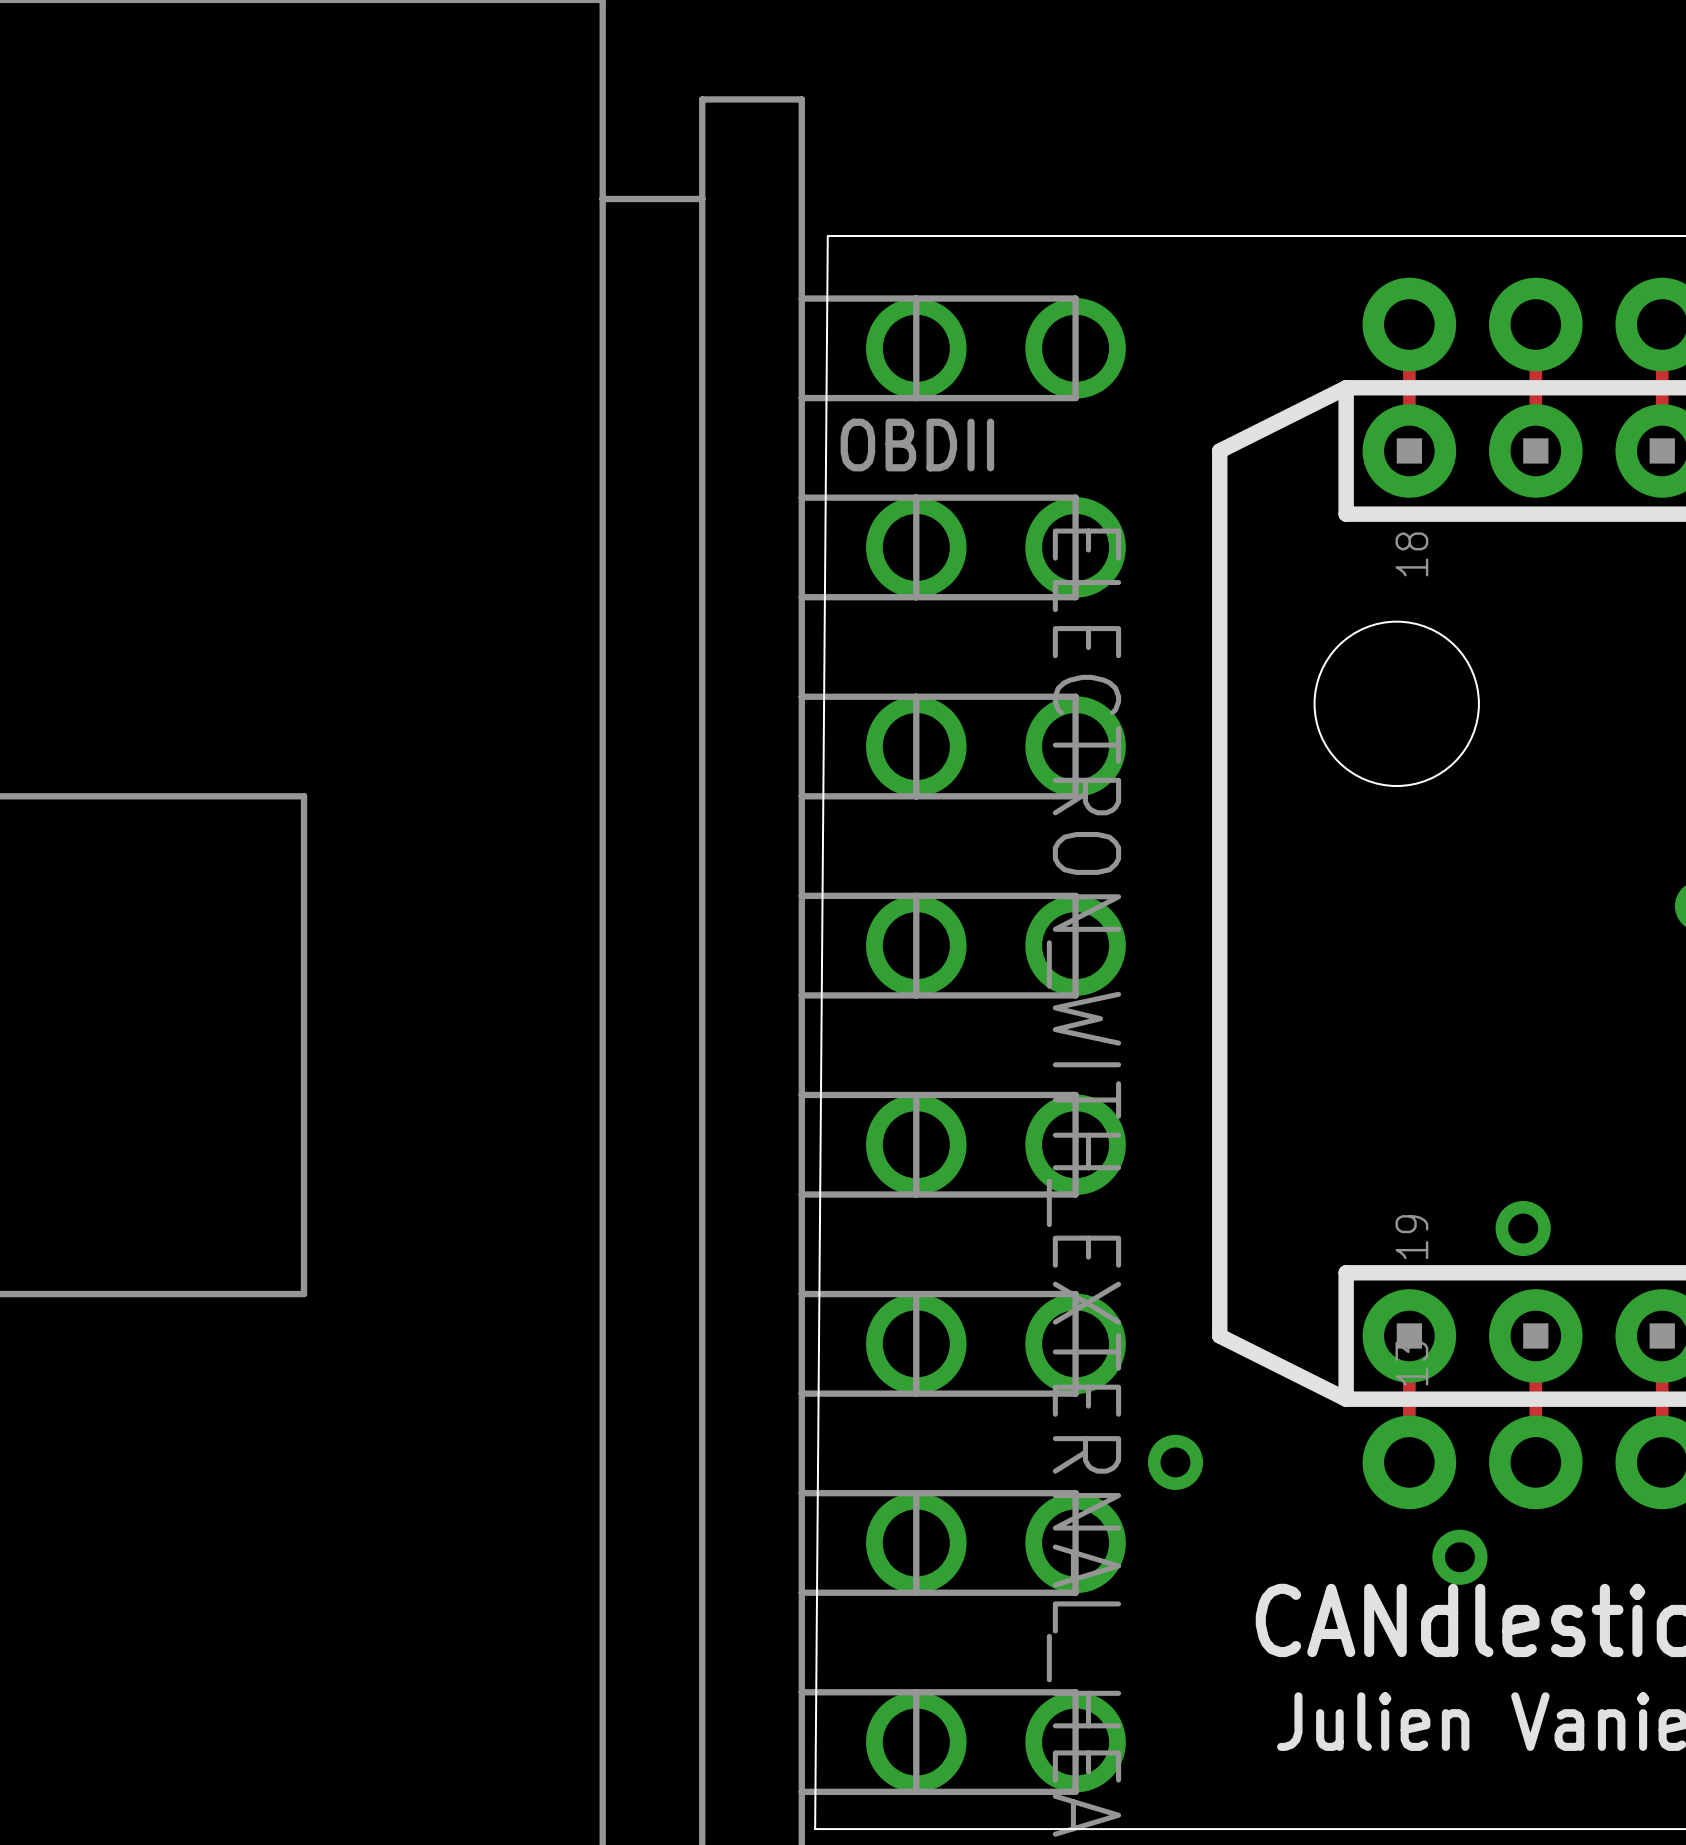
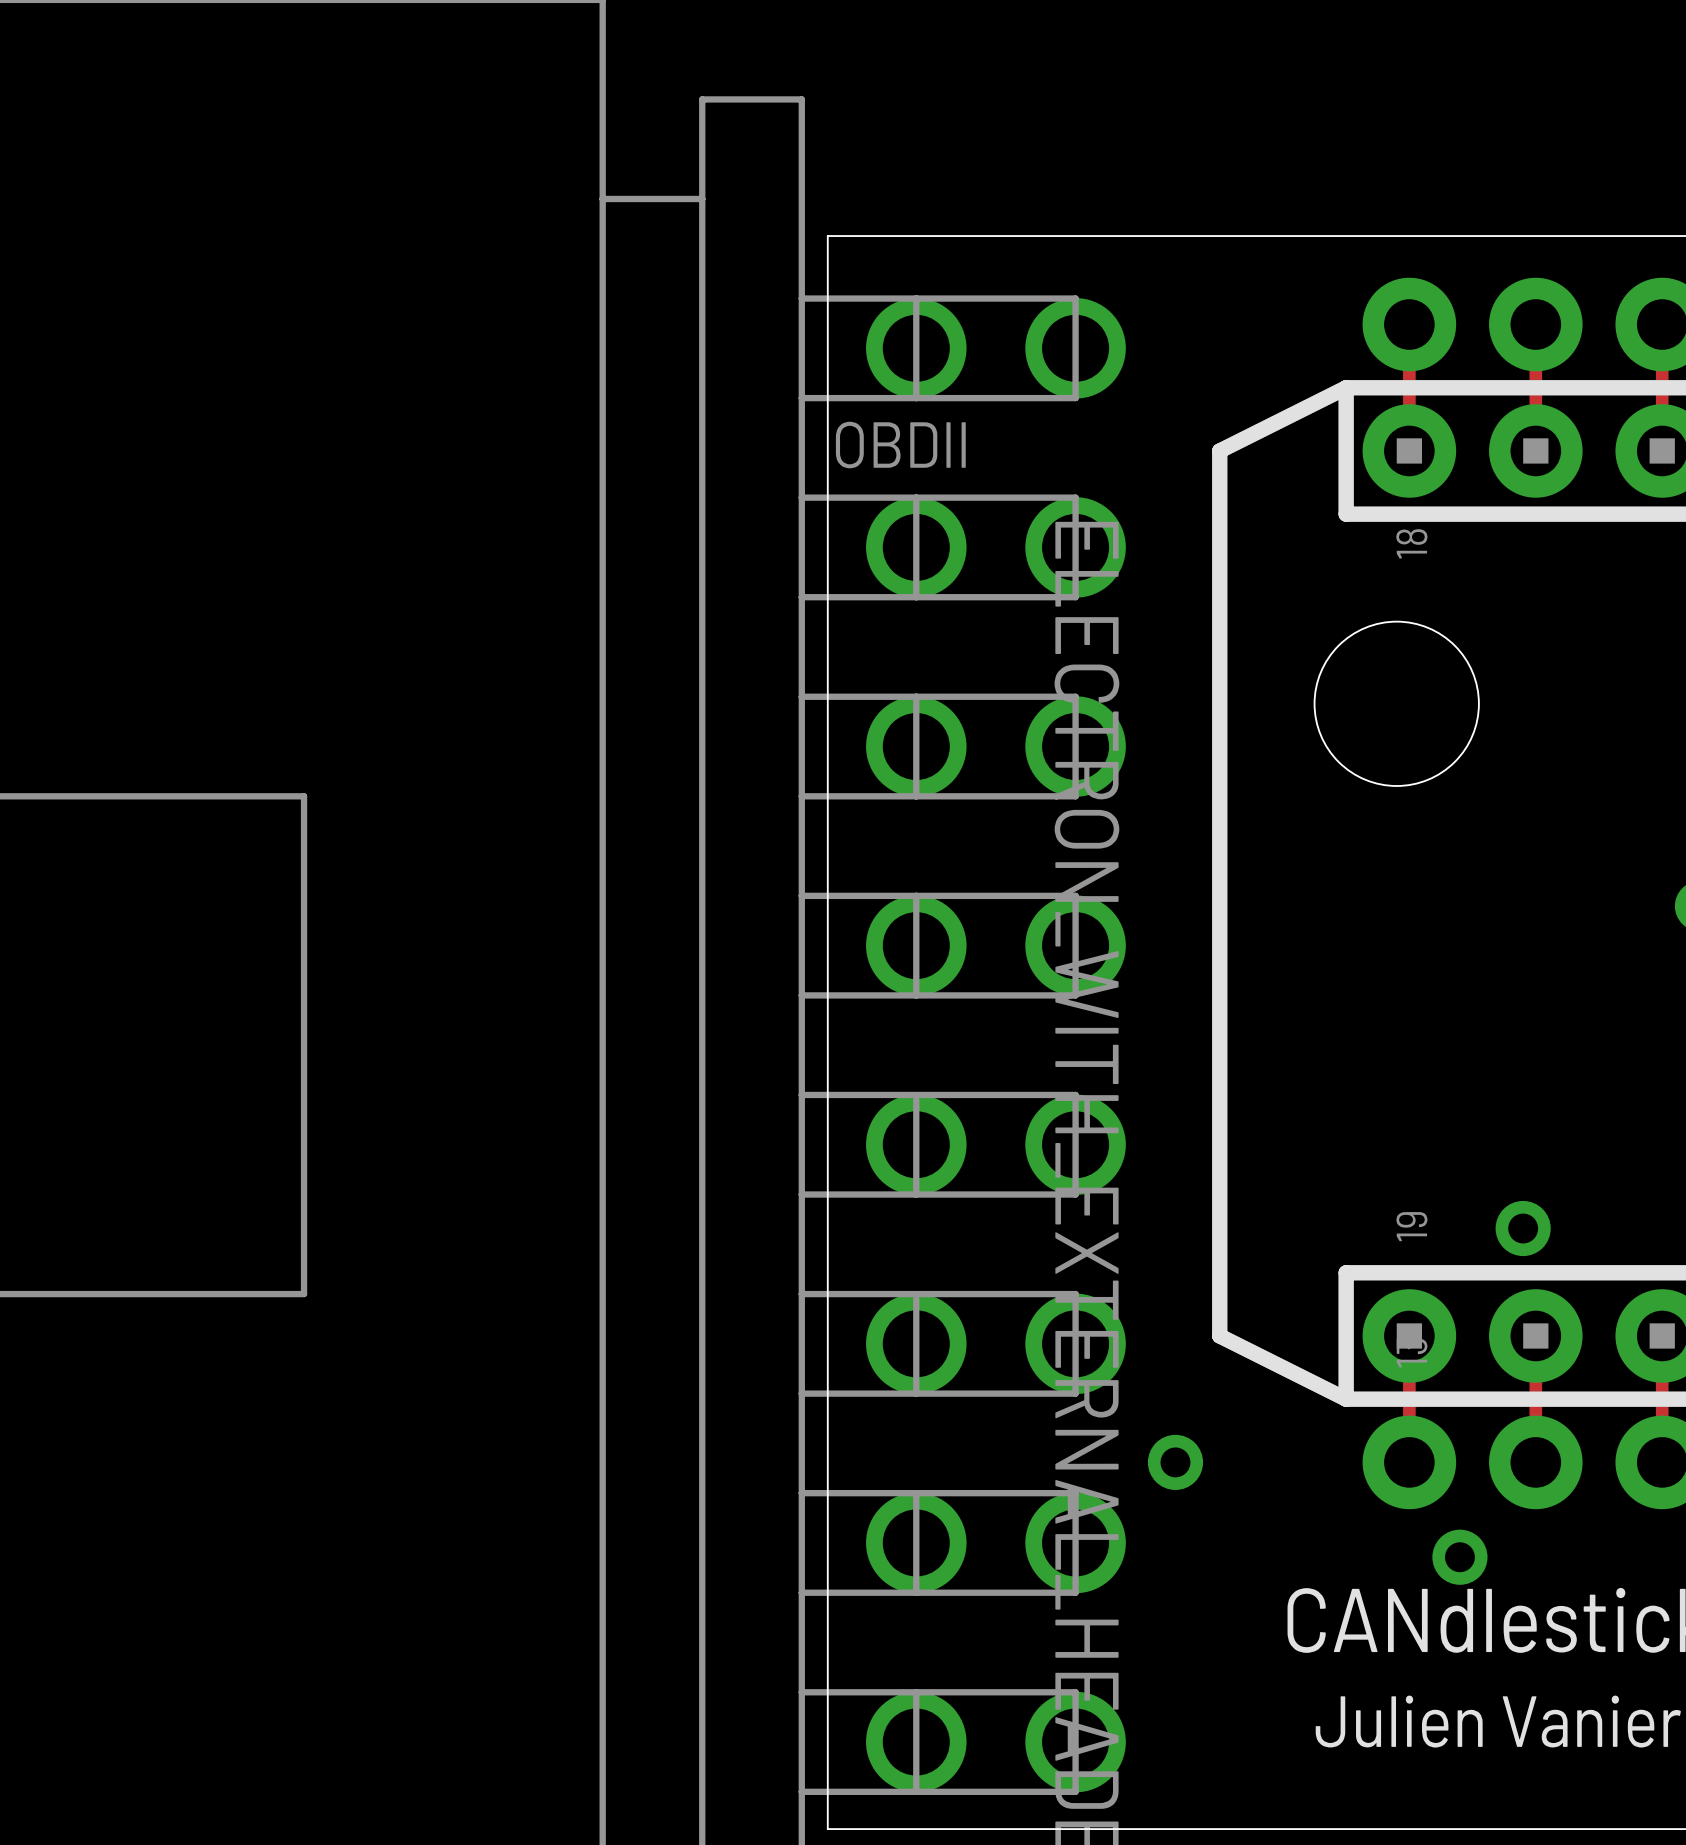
board edge: (827, 236) (815, 1829) (827, 1829) -> (827, 236) (827, 1829)

